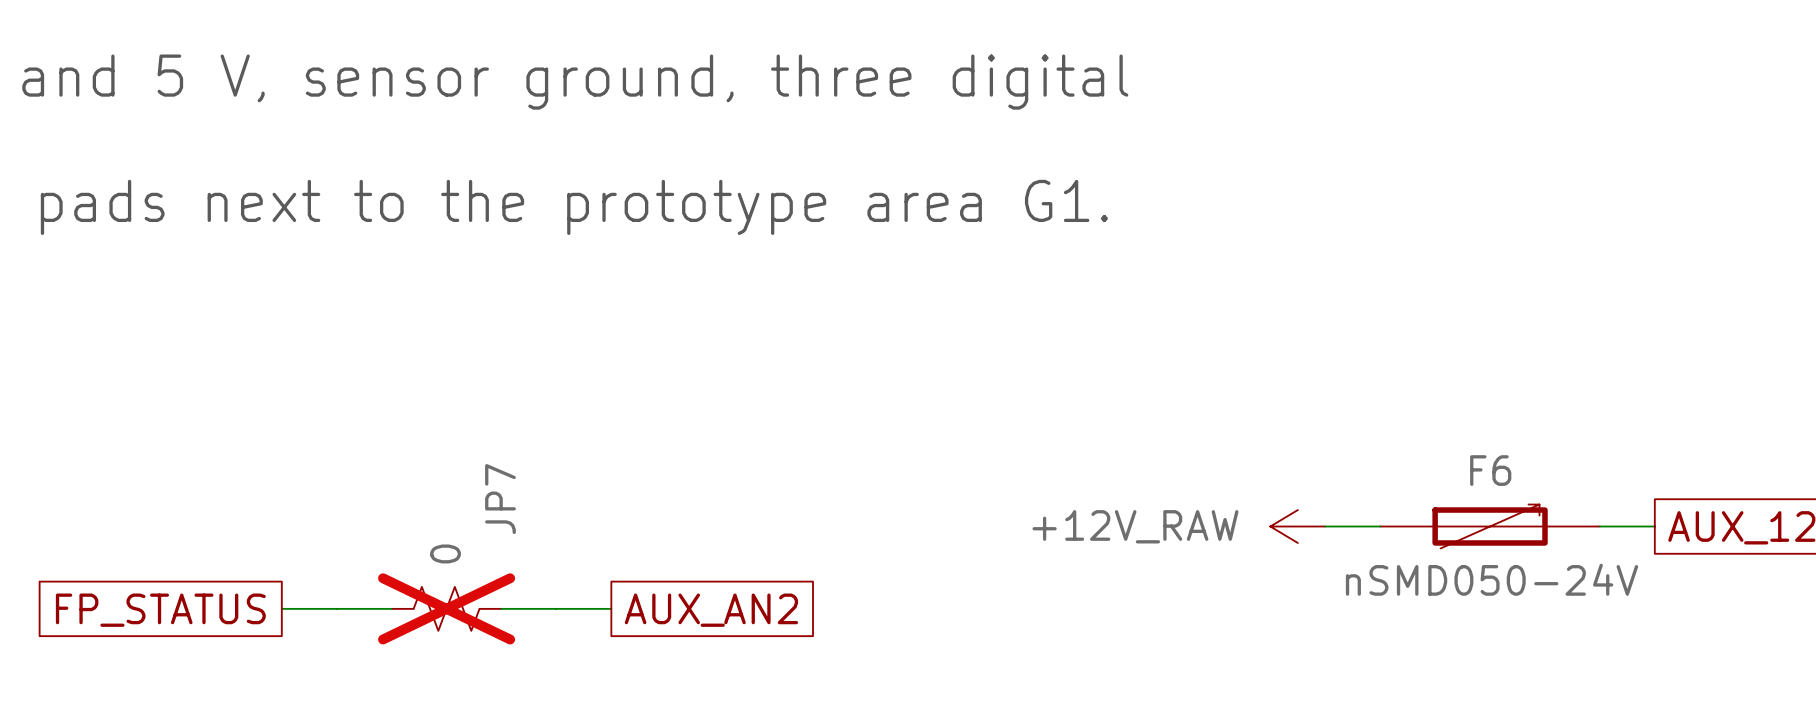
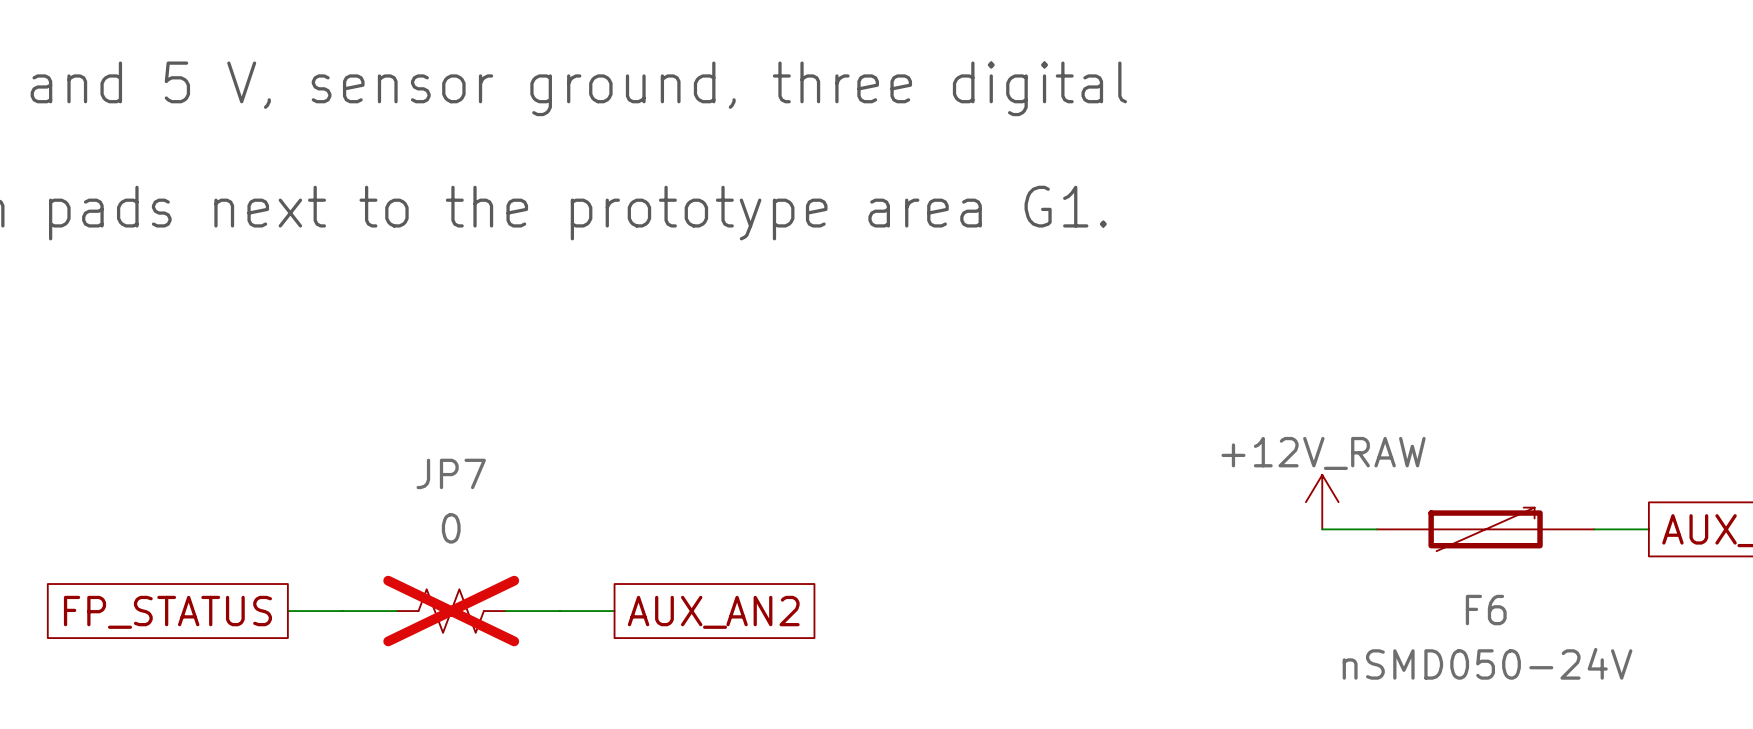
F6 name position: F6 (1490, 470) -> F6 (1486, 610)
JP7 name rotation: 0° (500, 499) -> 90° clockwise (451, 473)
power symbol text position: +12V_RAW (1135, 526) -> +12V_RAW (1323, 453)
power symbol rotation: 0° (1297, 526) -> 90° clockwise (1322, 502)
power symbol position: +12V_RAW (1297, 526) -> +12V_RAW (1322, 502)
JP7 value rotation: 0° (445, 553) -> 90° clockwise (451, 528)
F6 value position: nSMD050-24V (1492, 579) -> nSMD050-24V (1487, 663)

